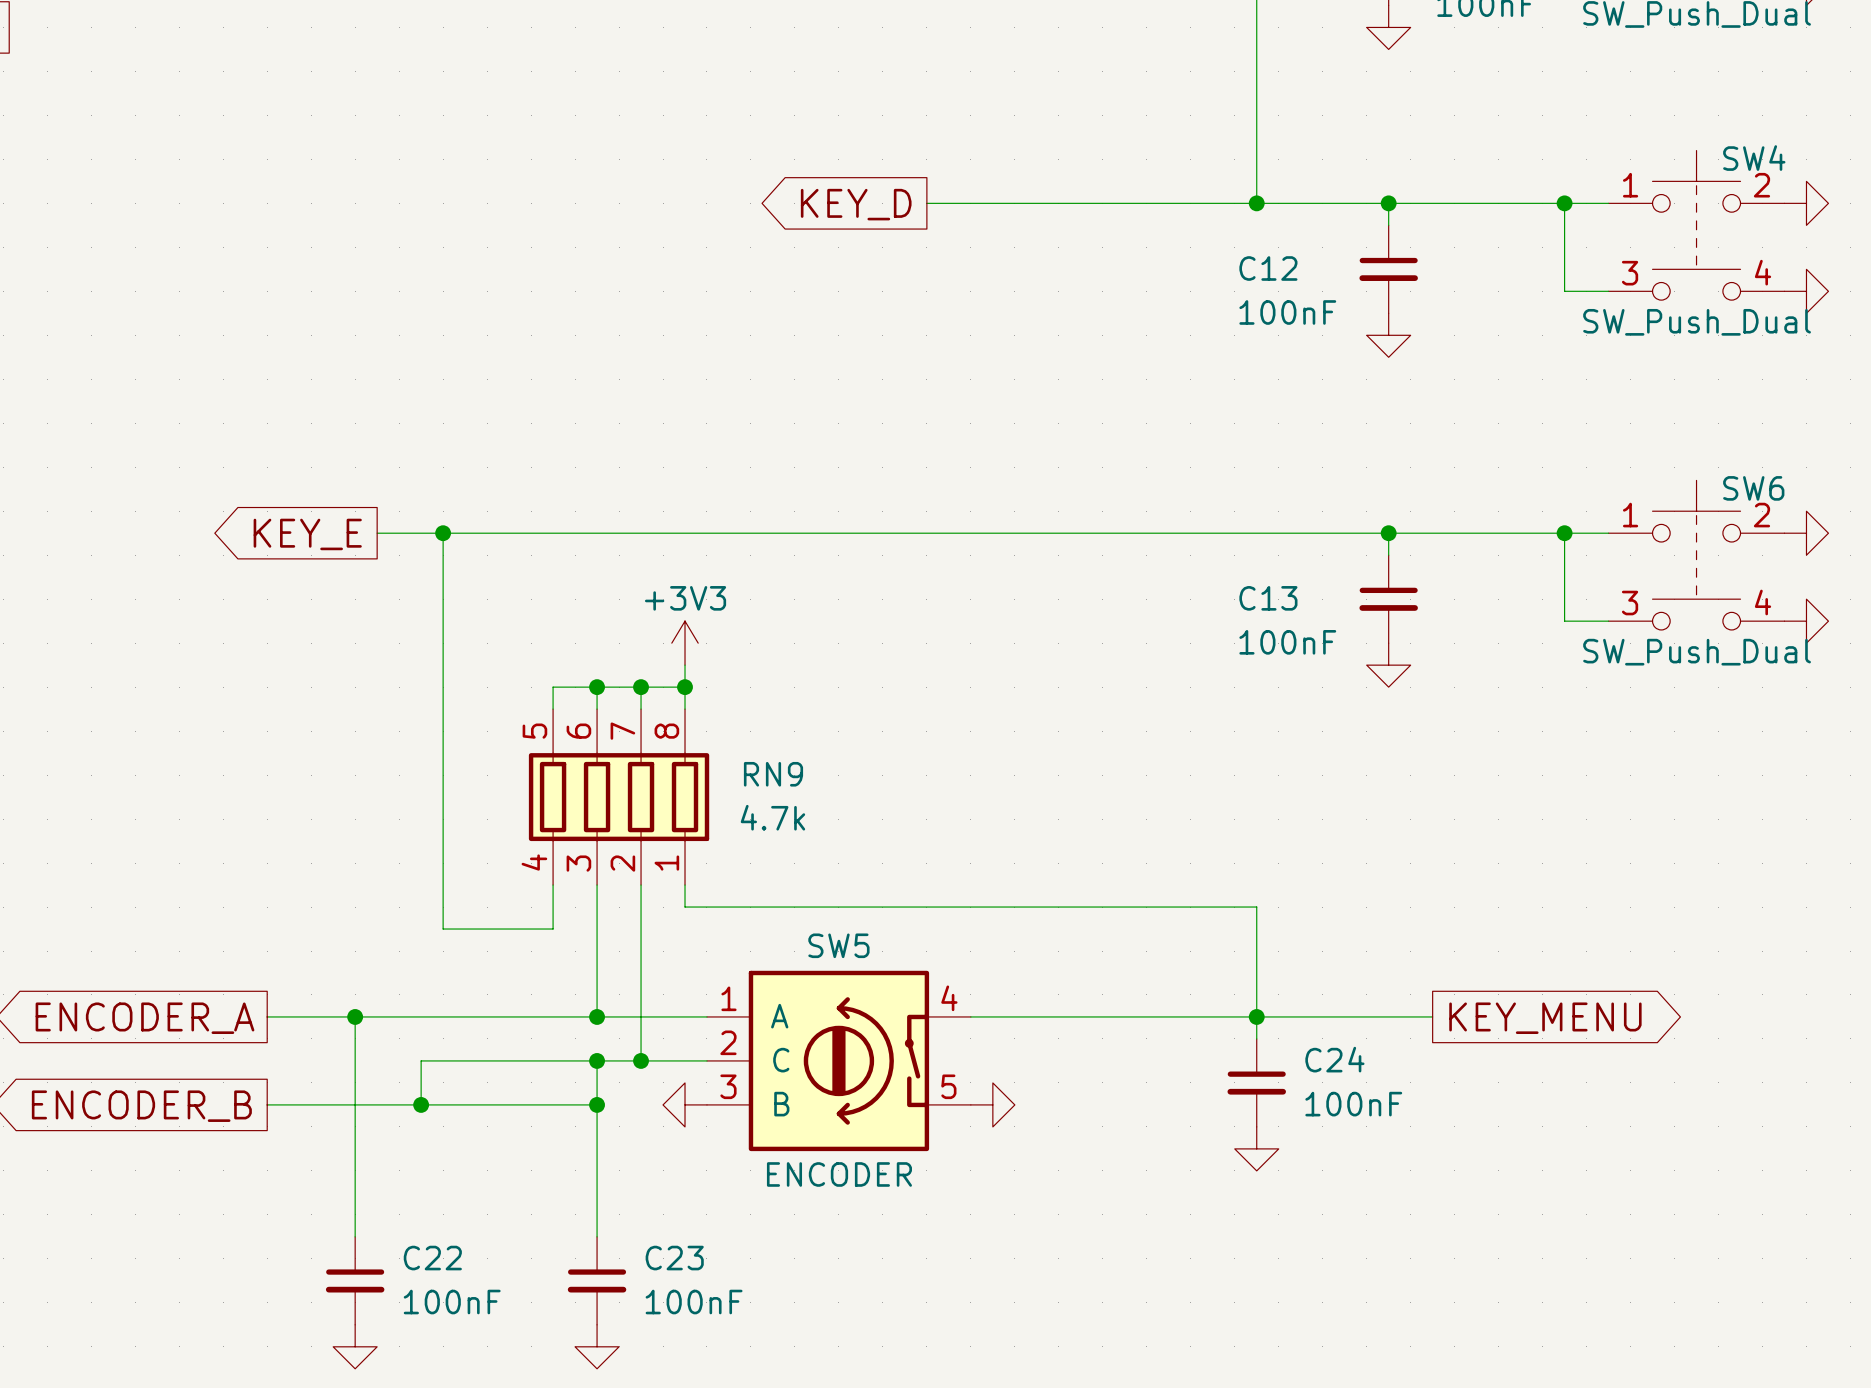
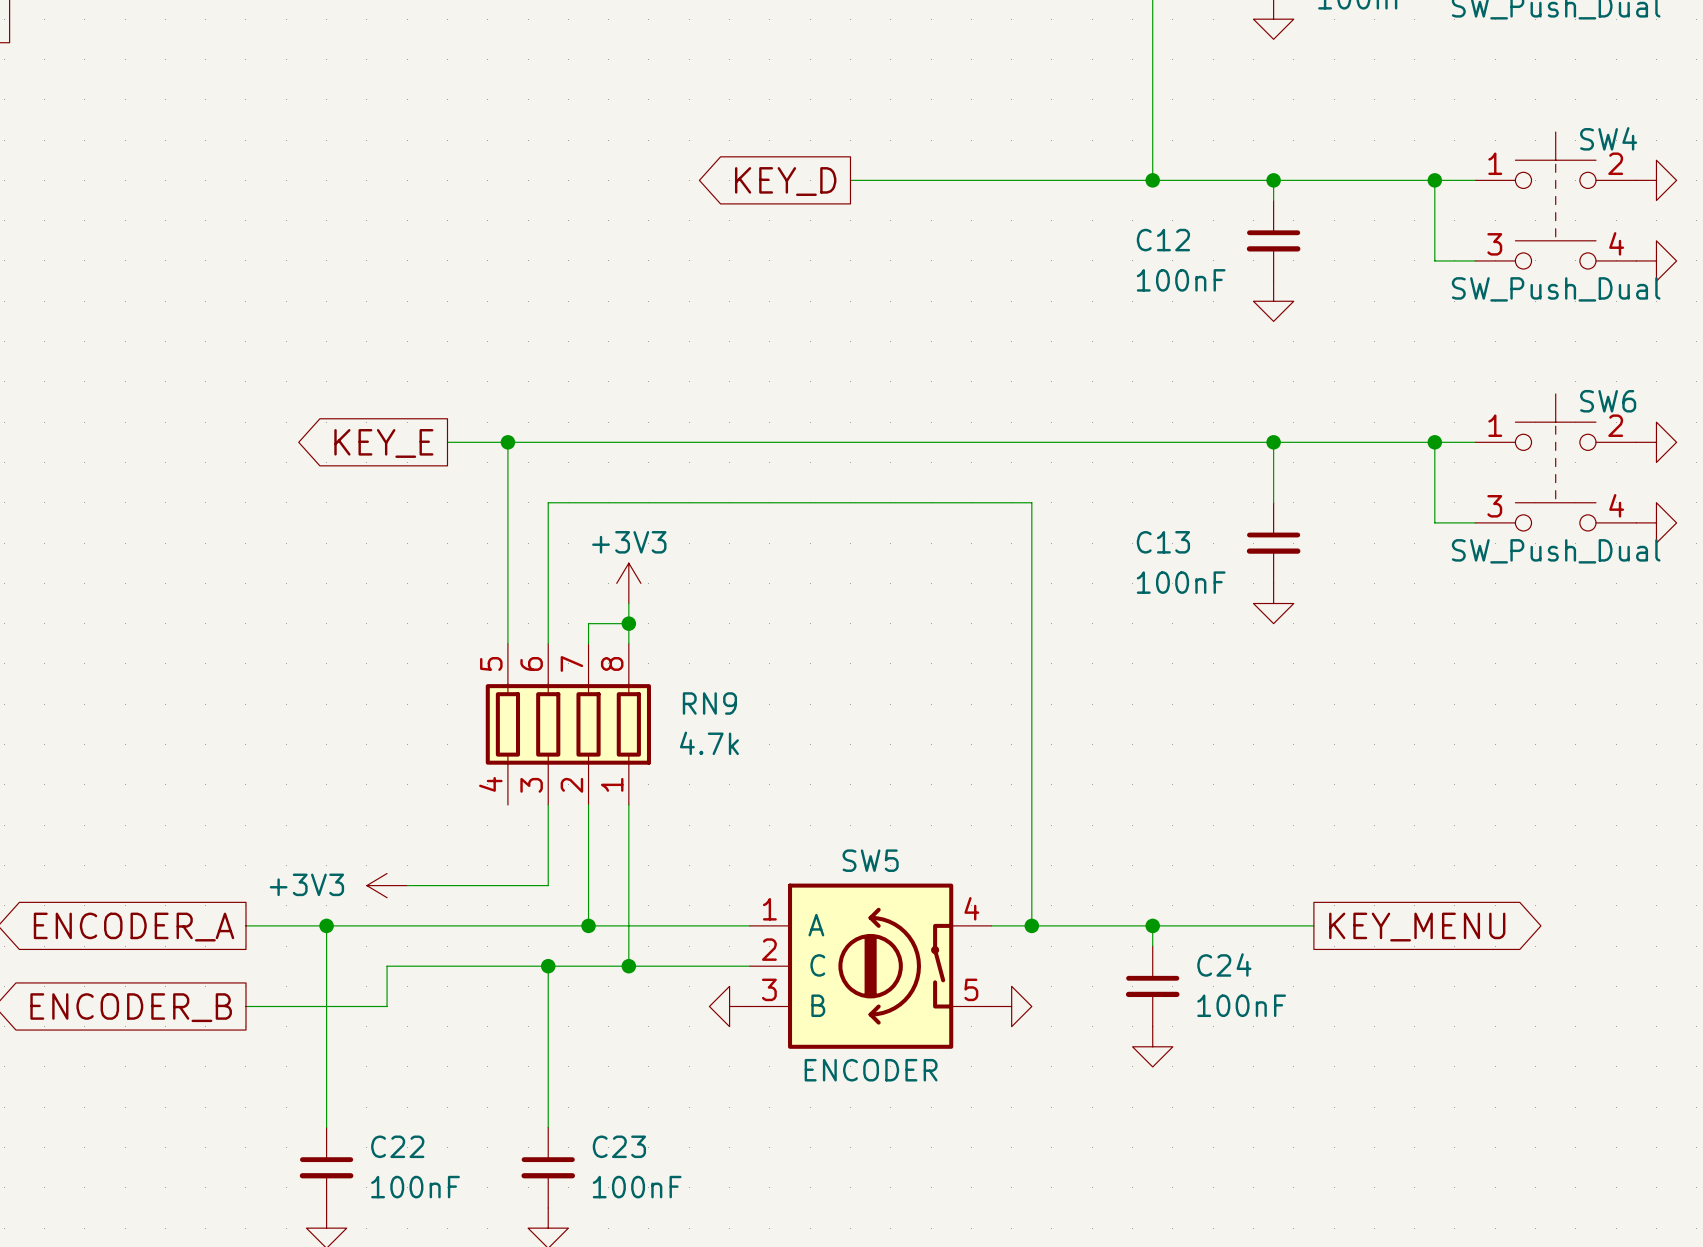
wire: none -> (447, 442) (1475, 442)
junction: none -> (507, 442)
wire: none -> (1273, 442) (1273, 482)
wire: none -> (1434, 442) (1434, 482)
power symbol: none -> (1656, 442)
wire: (377, 533) (1608, 533) -> none
wire: (443, 533) (443, 929) (553, 929) (553, 885) -> none
junction: (443, 533) -> none
junction position: (1388, 533) -> (1273, 442)
junction position: (1564, 533) -> (1434, 442)
power symbol: (1806, 533) -> none
global label position: KEY_E (307, 534) -> KEY_E (383, 443)
SW6 position: (1696, 555) -> (1555, 462)
wire: (1564, 577) (1564, 621) (1608, 621) -> (1434, 522) (1475, 522)
power symbol: none -> (1656, 522)
power symbol: (1806, 621) -> none
wire: (553, 687) (641, 687) -> (507, 623) (507, 442)
wire: none -> (548, 623) (548, 502) (1031, 502) (1031, 925)
junction: (597, 687) -> none
junction: (641, 687) -> none
wire: (685, 907) (1256, 907) (1256, 1016) -> (628, 825) (628, 966)
power symbol: none -> +3V3 (387, 885)
wire: (597, 972) (597, 1016) -> (548, 885) (407, 885)
junction: (597, 1016) -> none
wire: (641, 1016) (641, 1060) -> none
junction: none -> (588, 925)
junction: none -> (1031, 925)
junction: (641, 1060) -> none
junction: none -> (628, 966)
SW5 position: (838, 1060) -> (870, 966)
wire: (421, 1104) (597, 1104) -> none
junction: (421, 1104) -> none
junction: (597, 1104) -> none
power symbol: (685, 1104) -> none
power symbol: none -> (729, 1006)
power symbol: (992, 1104) -> none
power symbol: none -> (1011, 1006)

